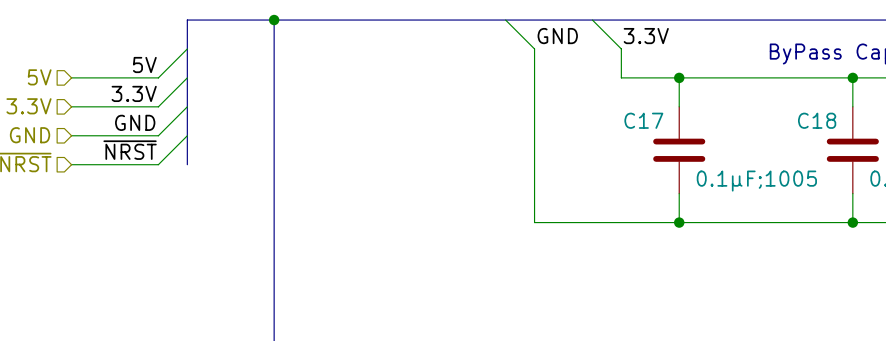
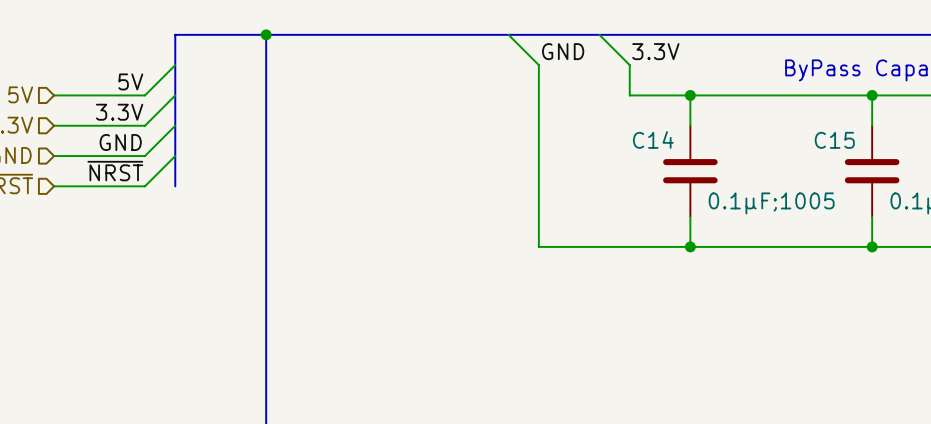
C17 name: C17 (643, 120) -> C14 (653, 139)
C18 name: C18 (817, 120) -> C15 (834, 140)

